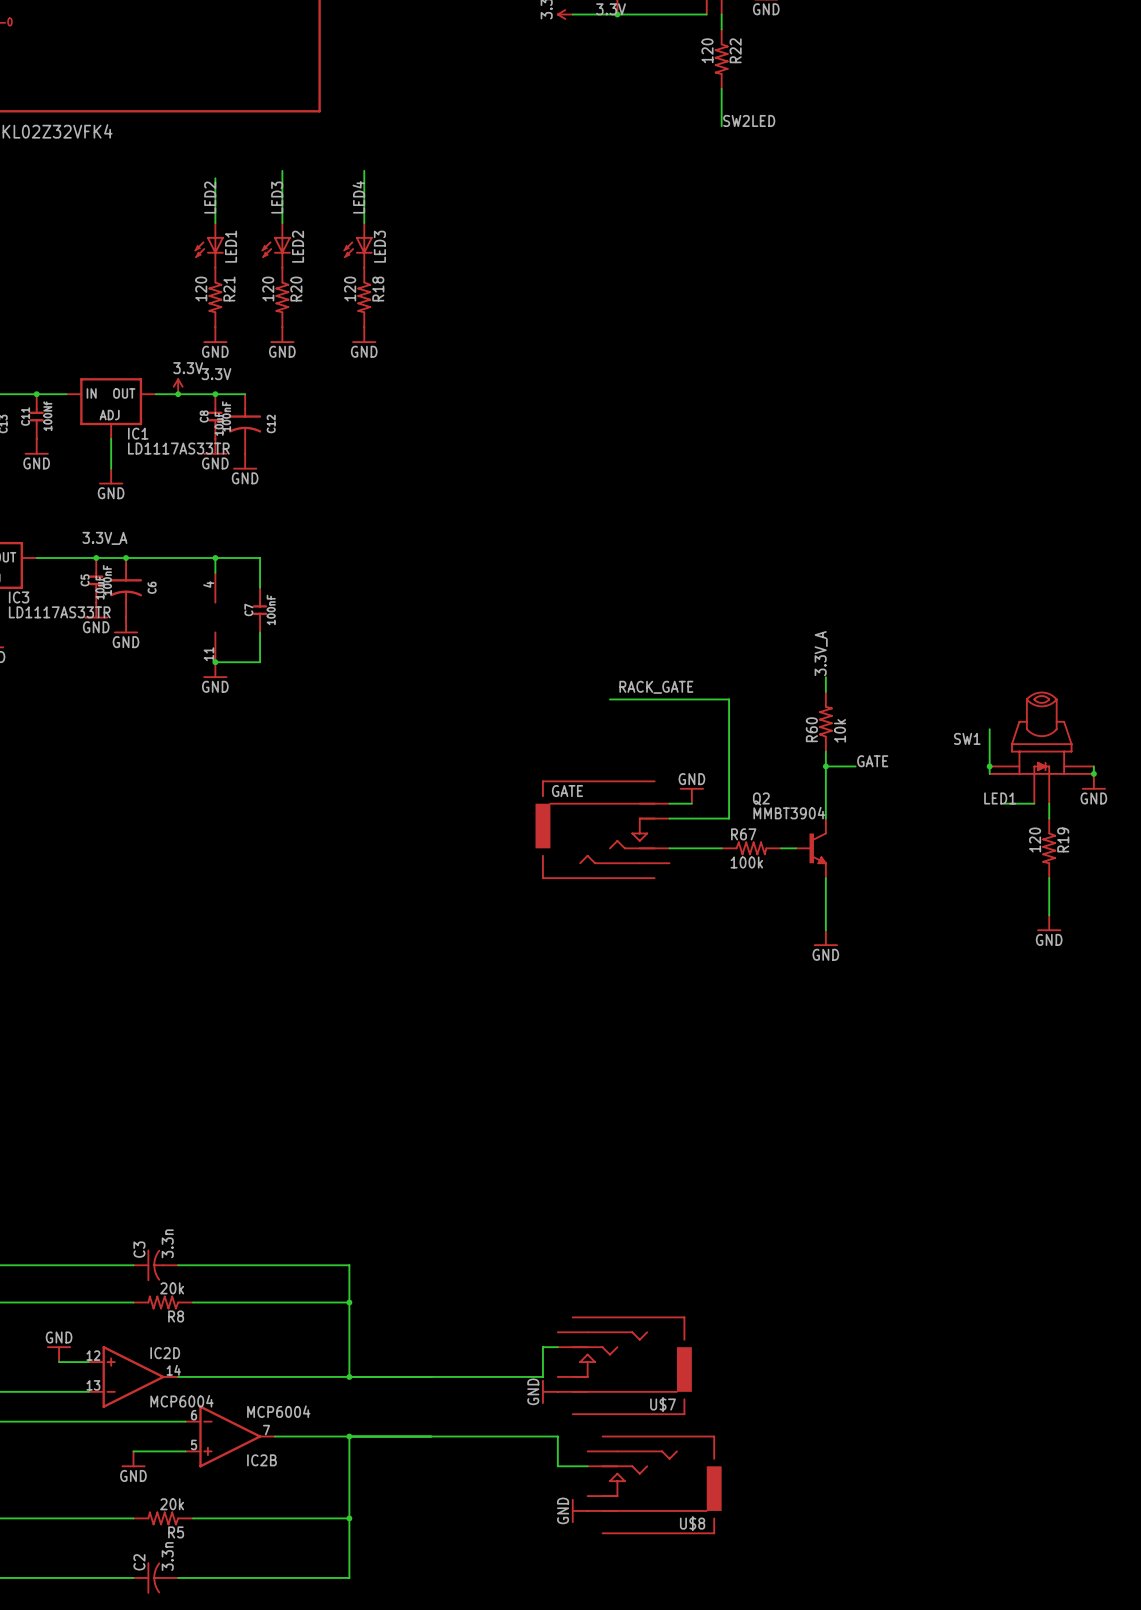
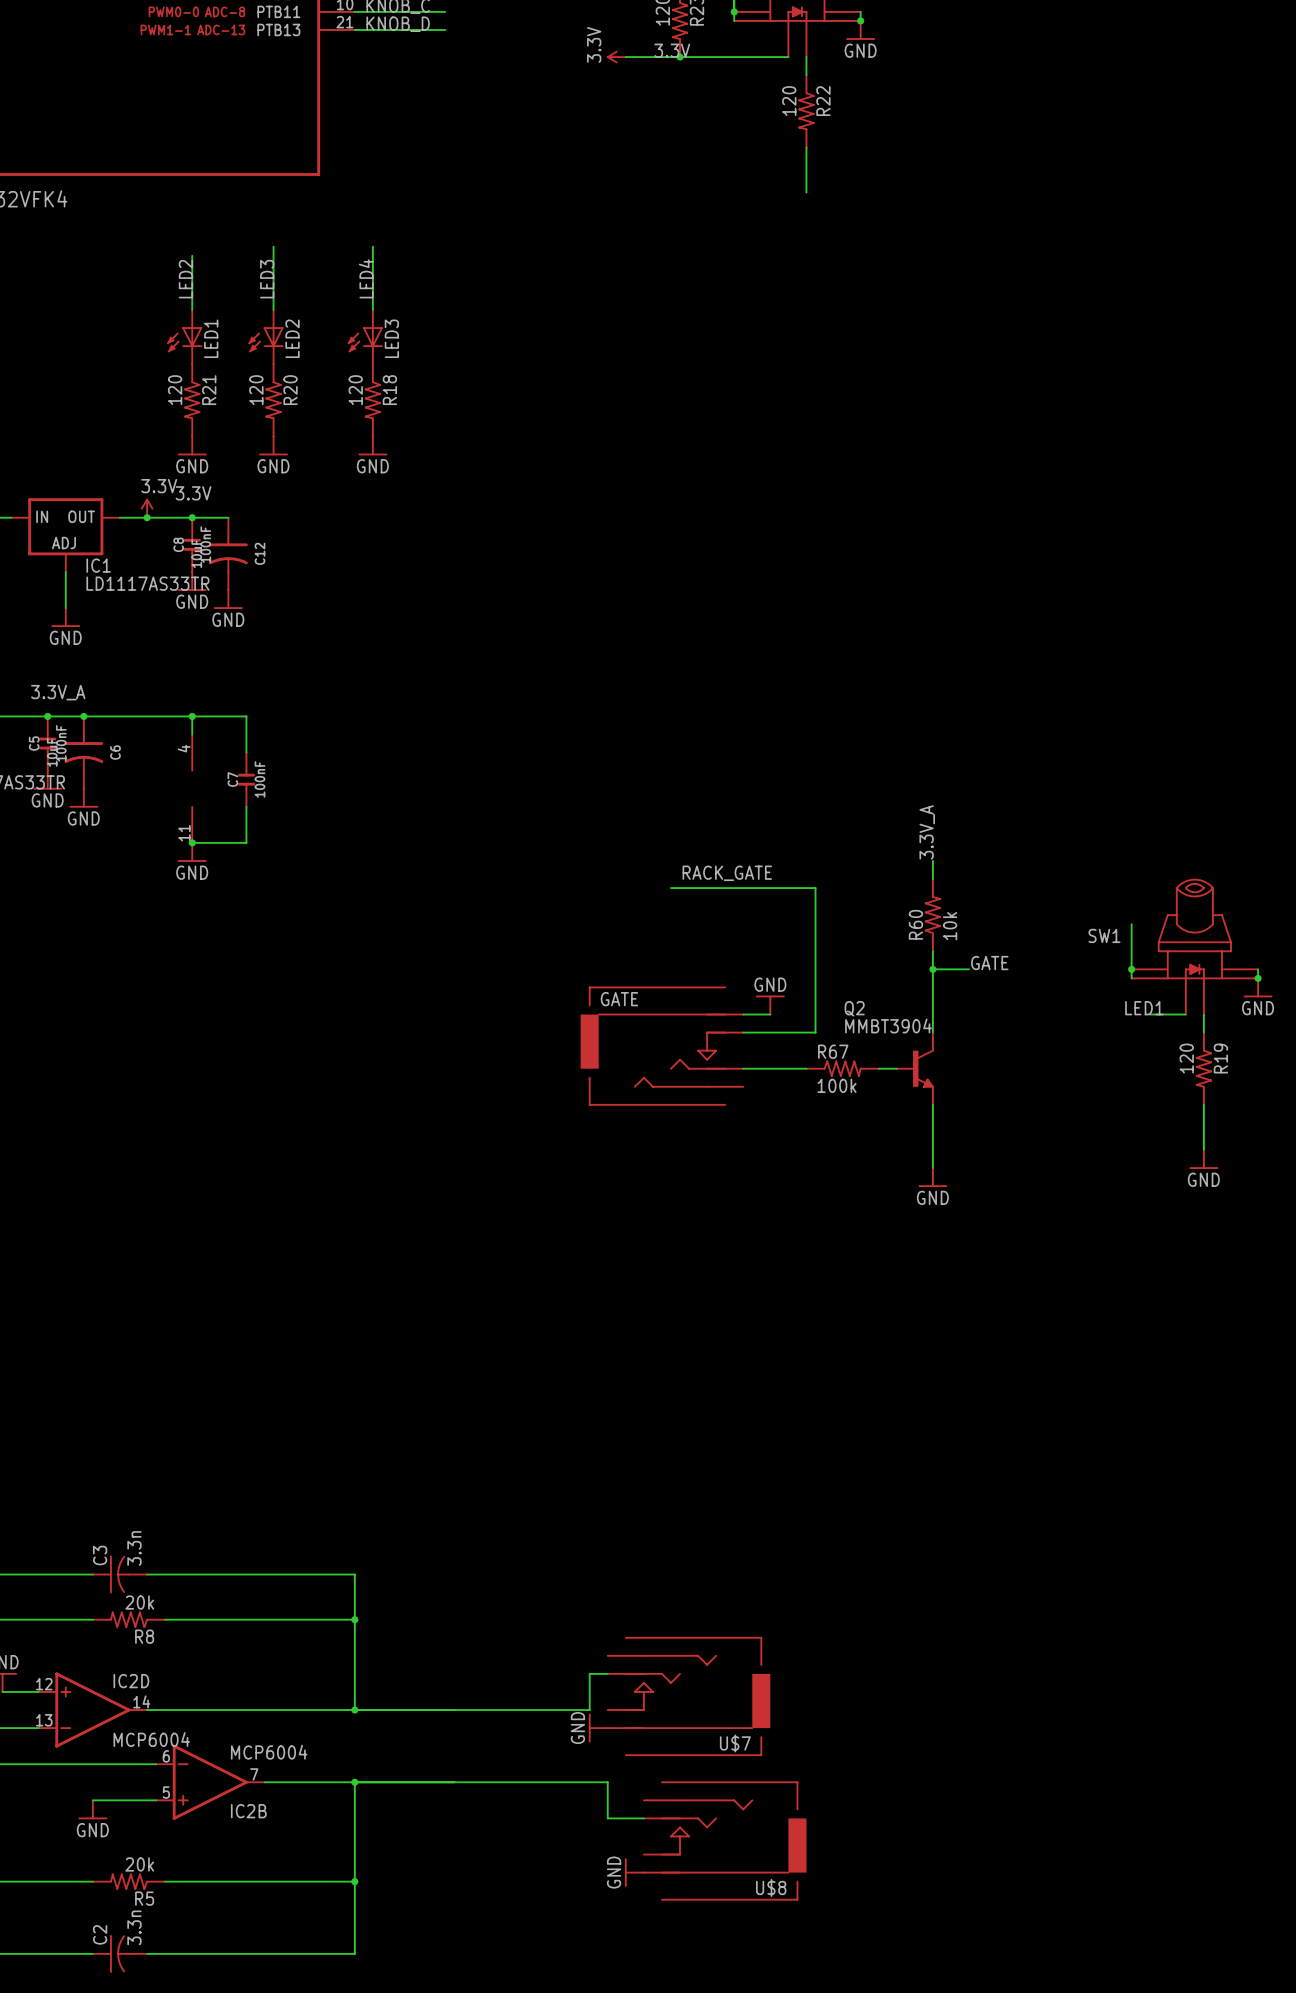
label: SW2LED (749, 120) -> none

